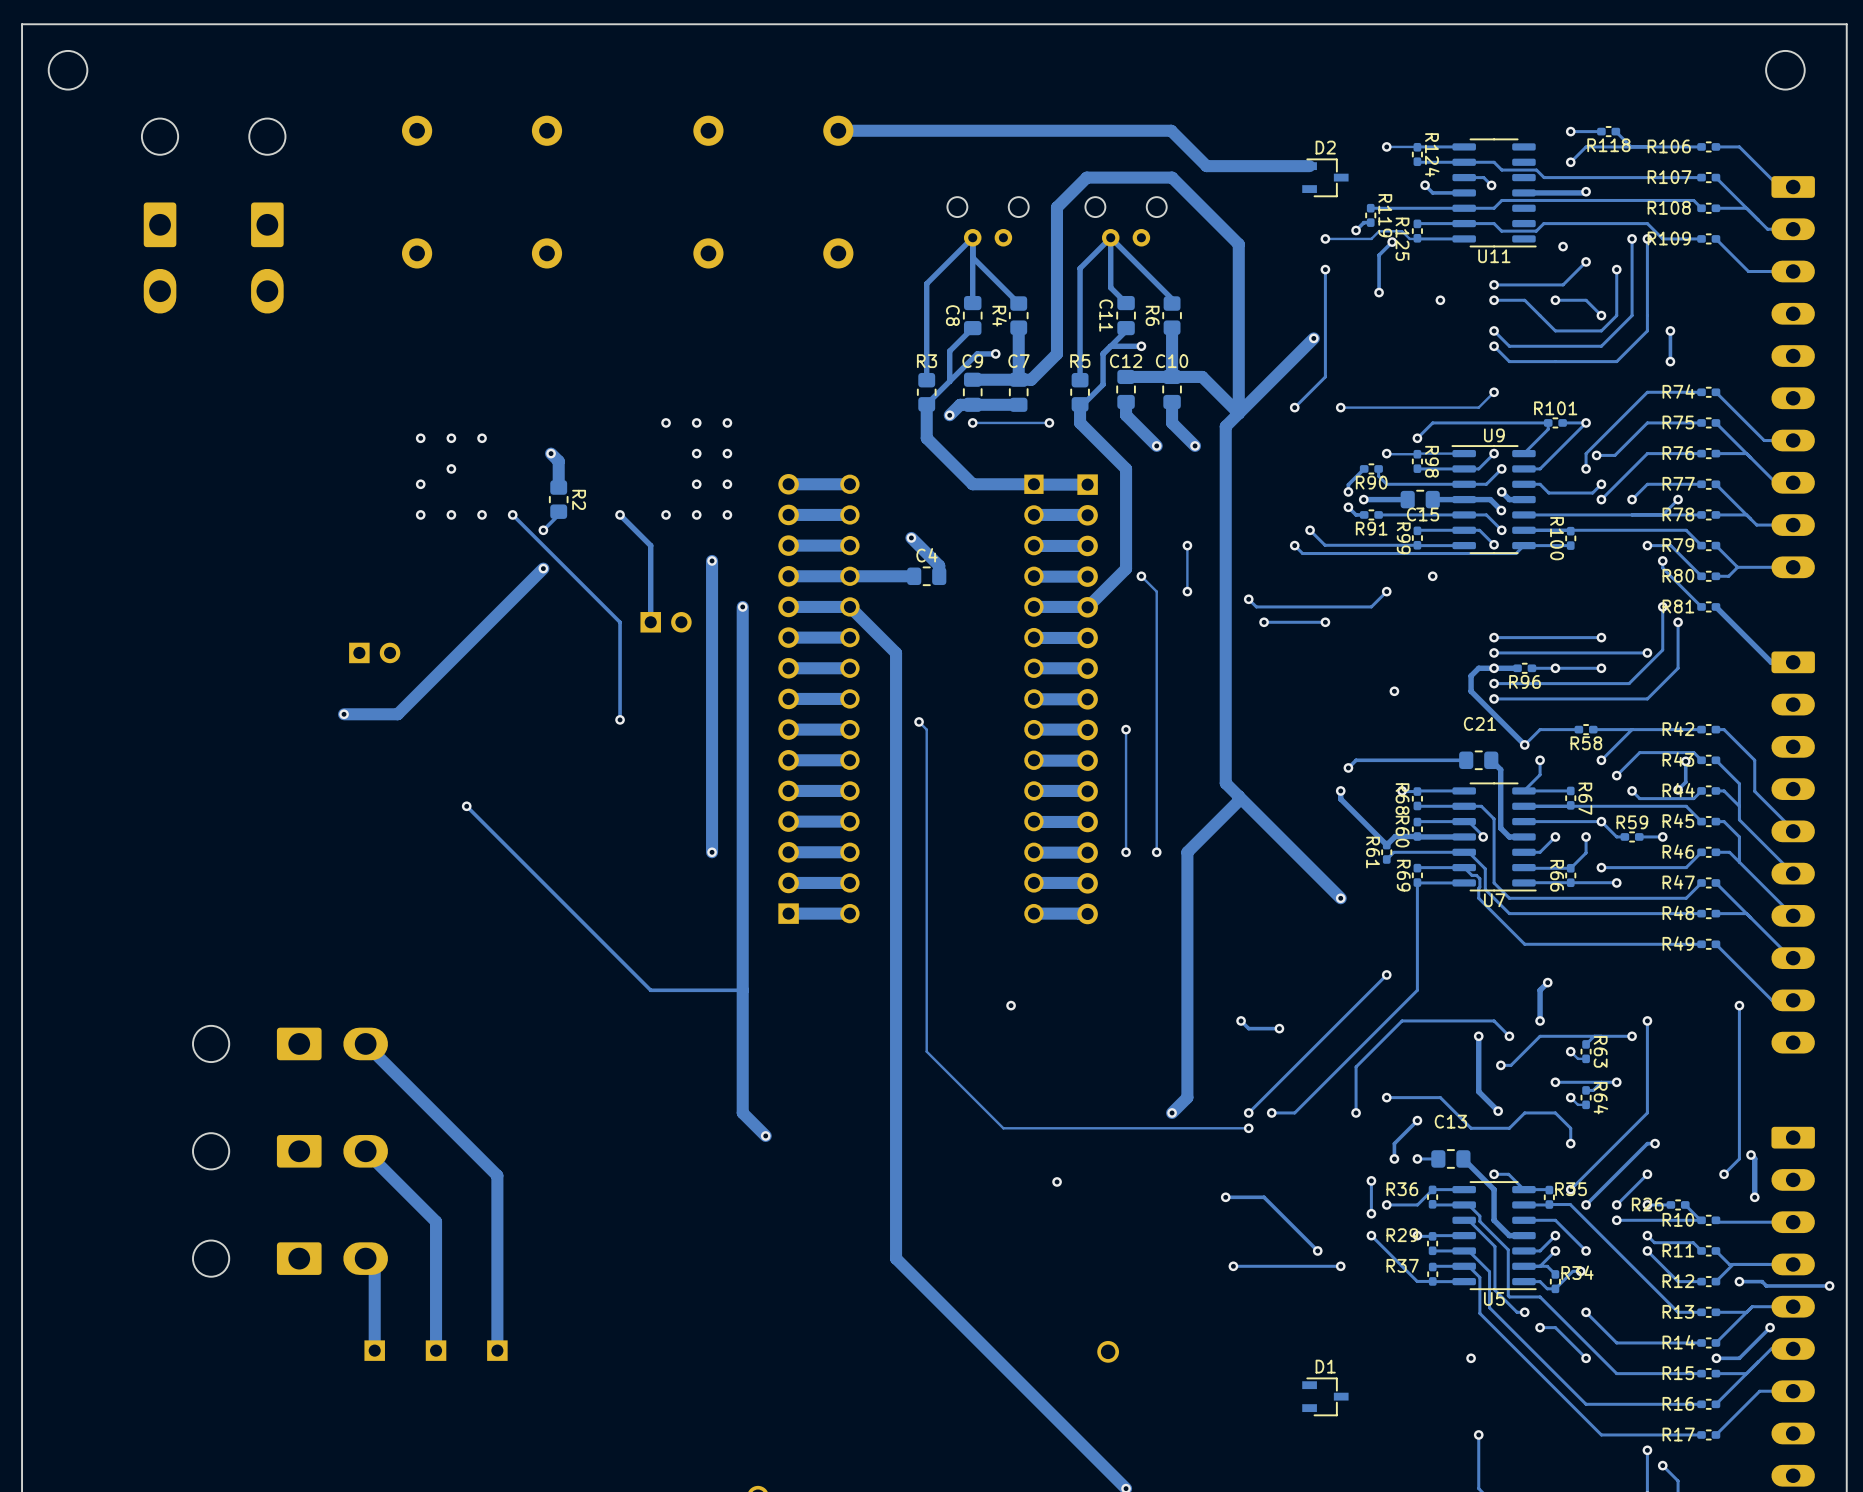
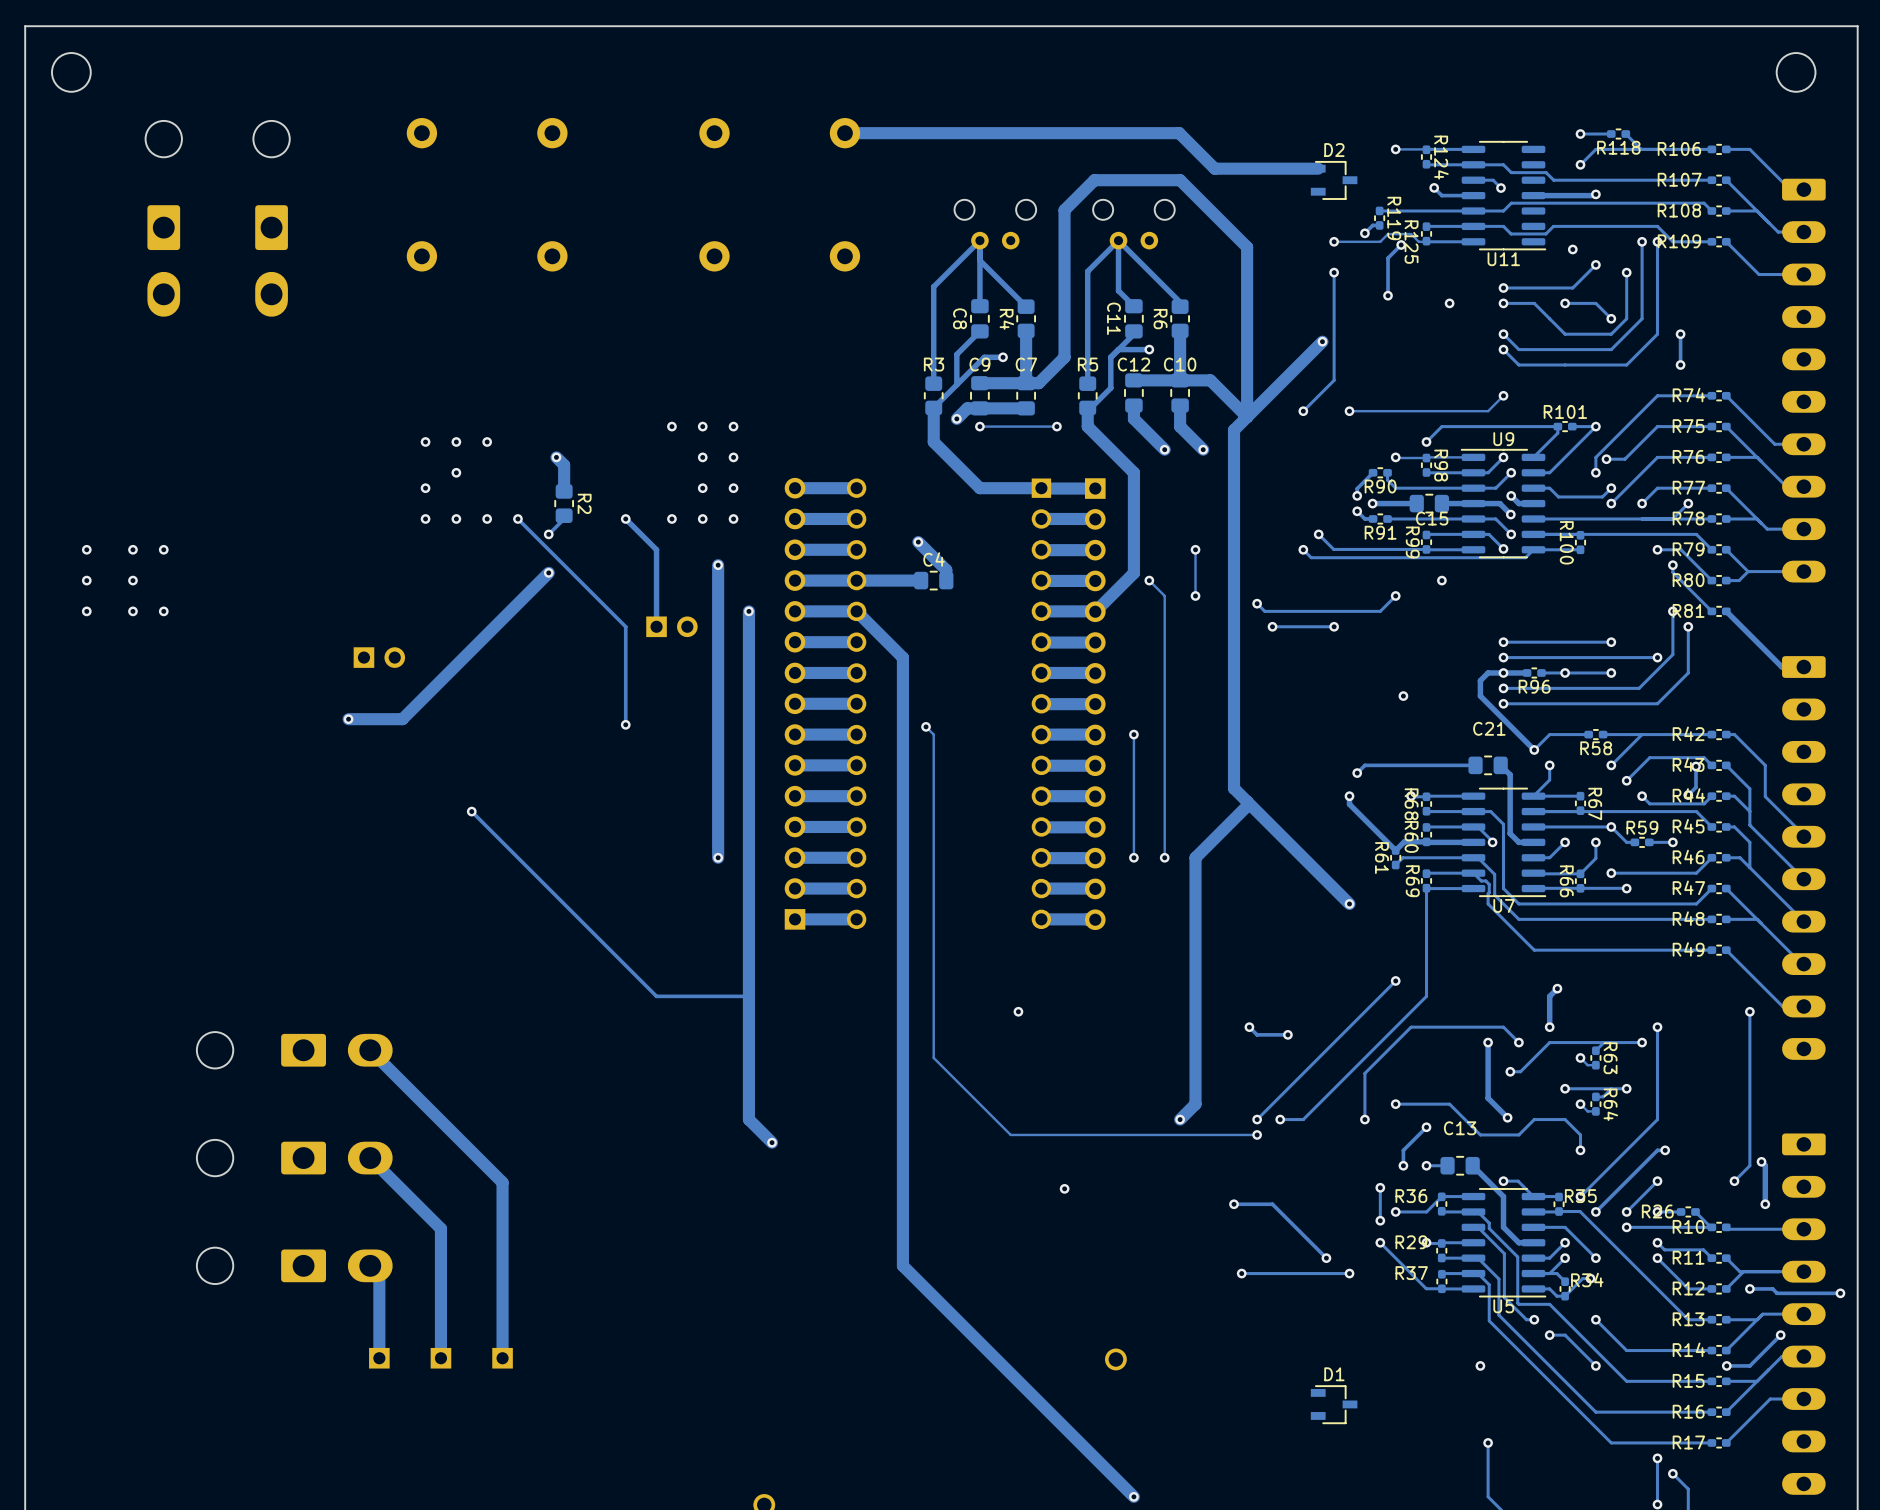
via: none -> (86, 549)
via: none -> (132, 549)
via: none -> (163, 549)
via: none -> (86, 580)
via: none -> (132, 580)
via: none -> (86, 611)
via: none -> (132, 611)
via: none -> (163, 611)

